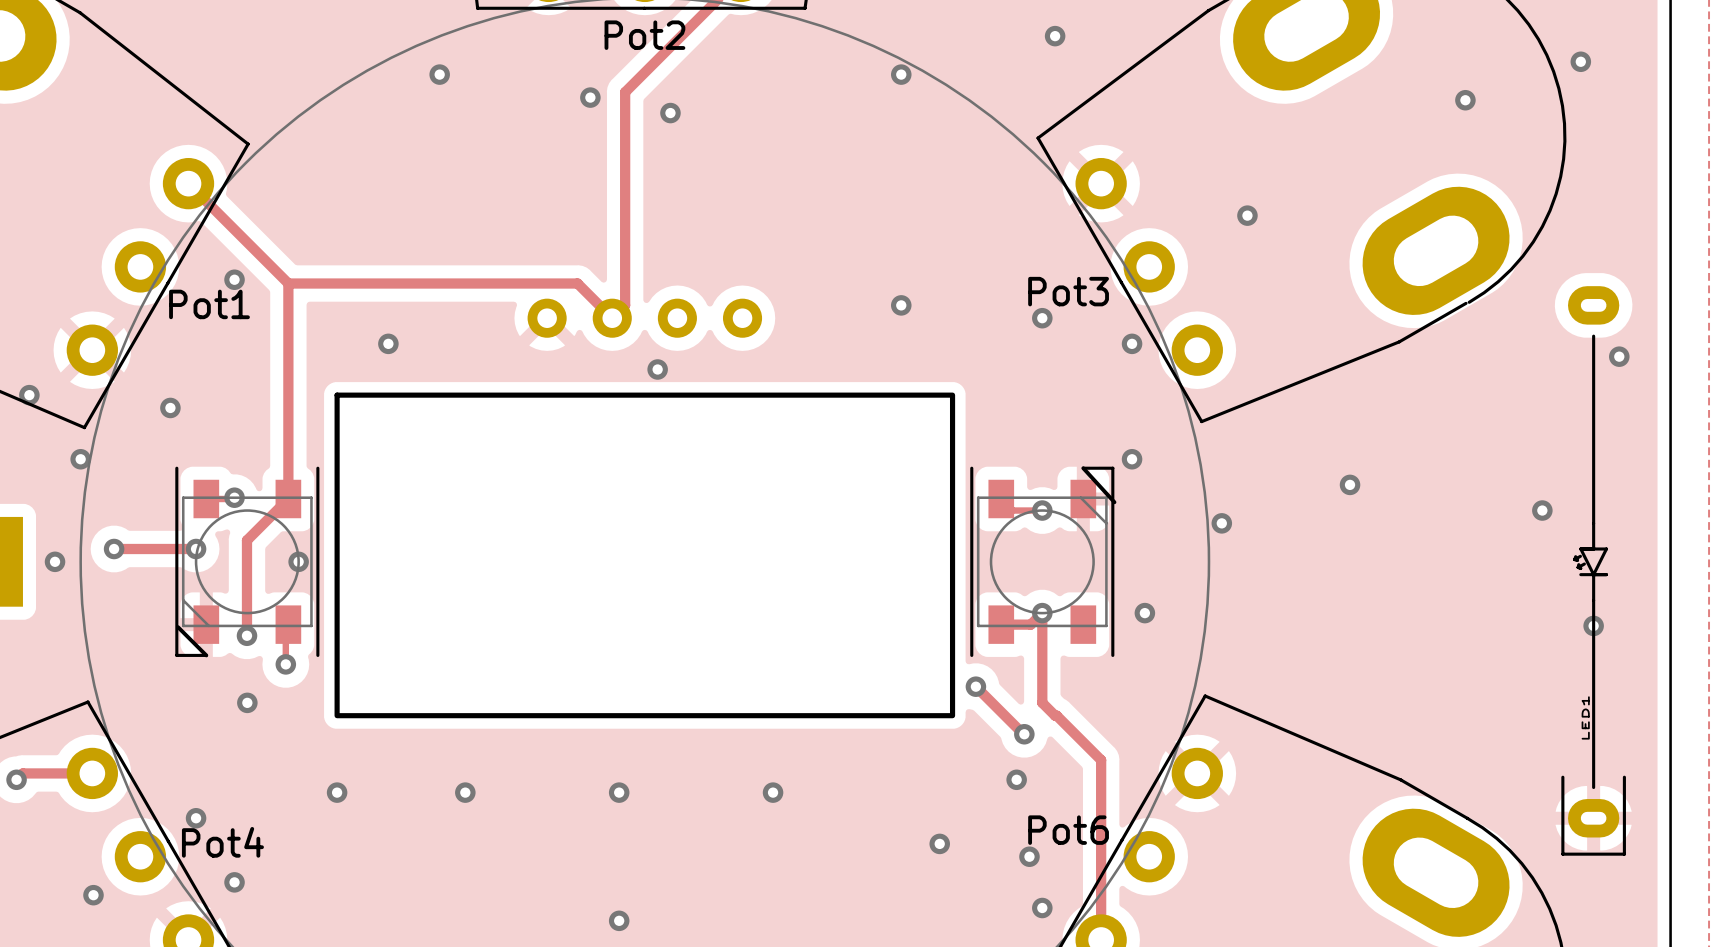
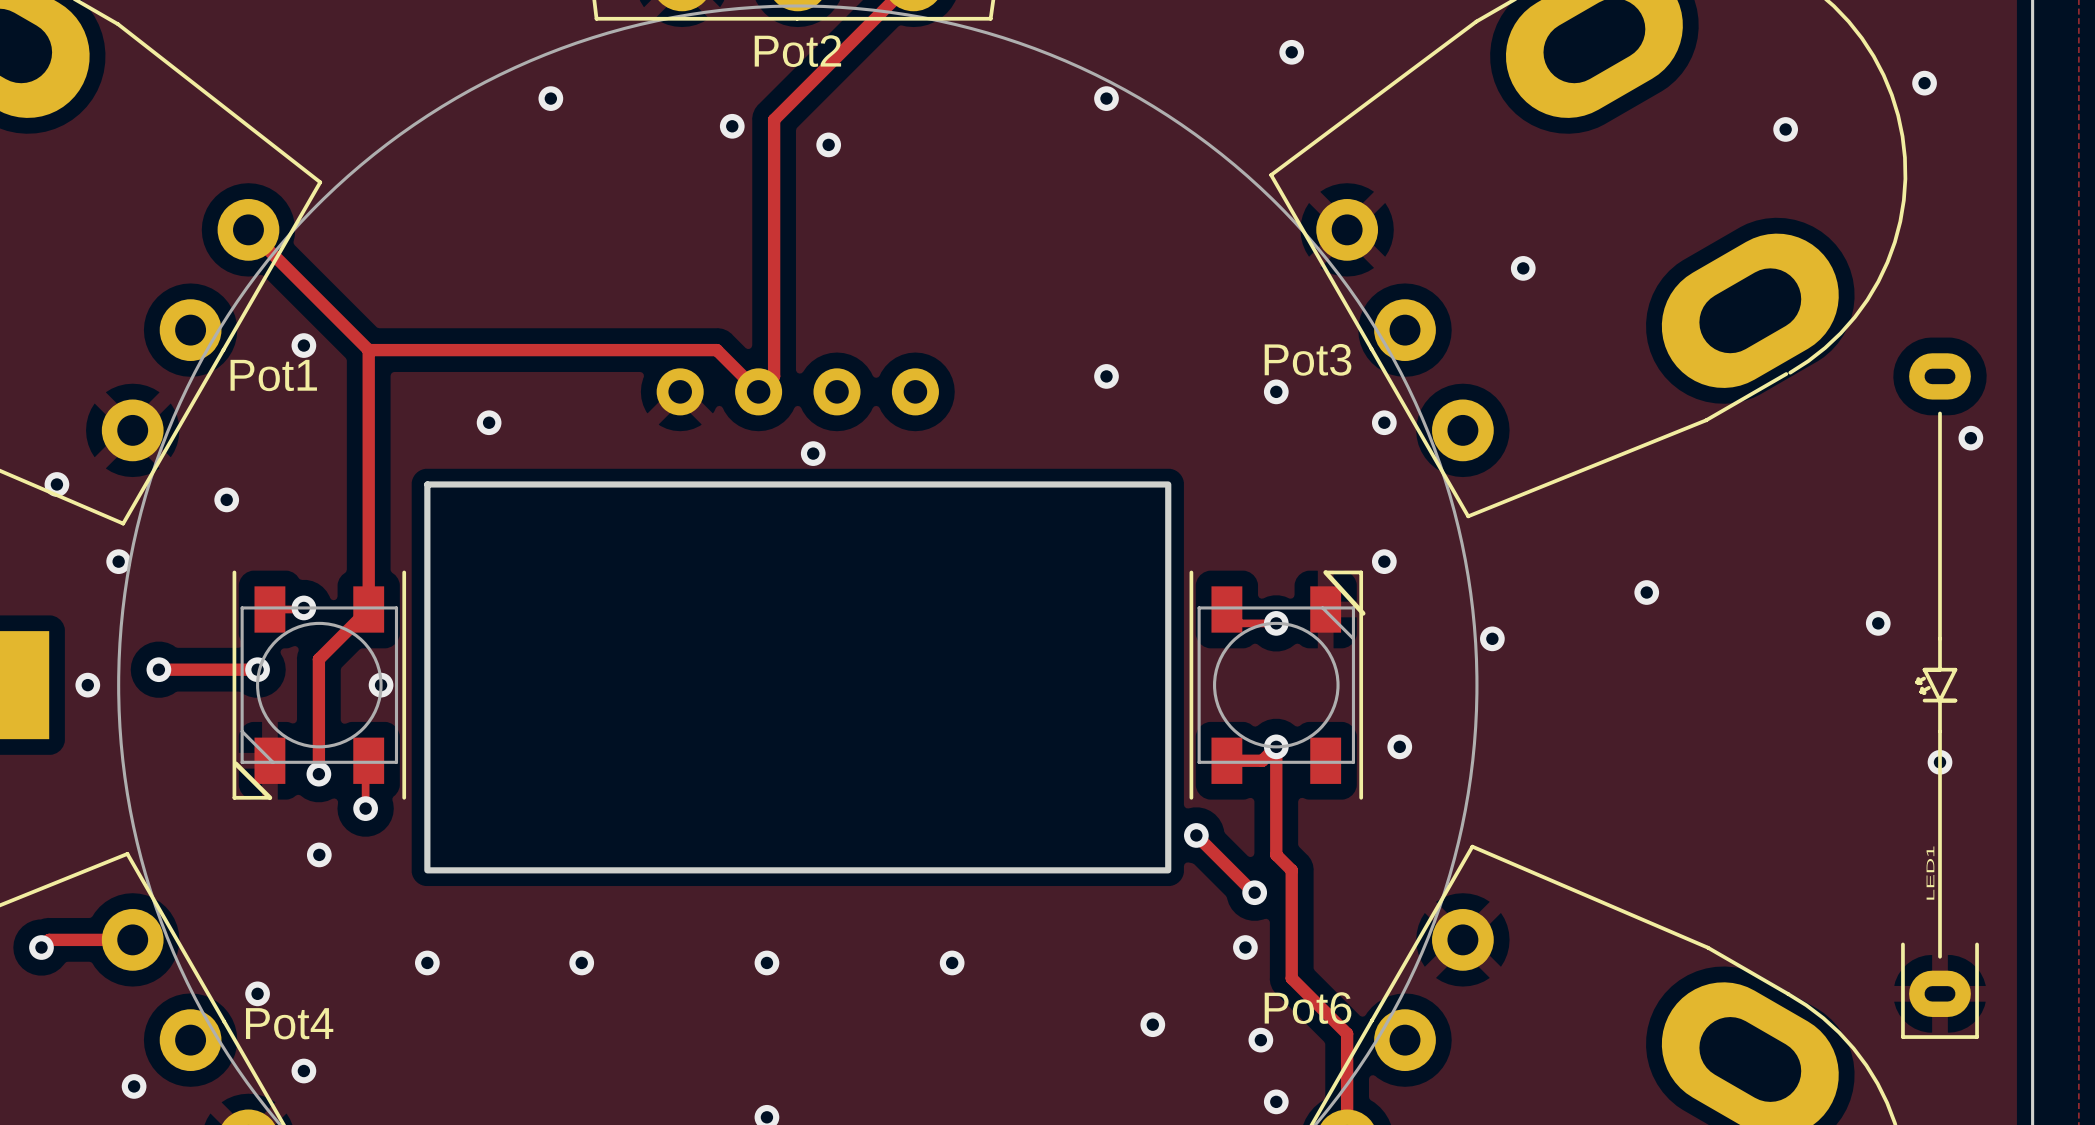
track: (1055, 715) (1101, 760) (1101, 851) -> (1291, 870) (1291, 978) (1347, 1033)

